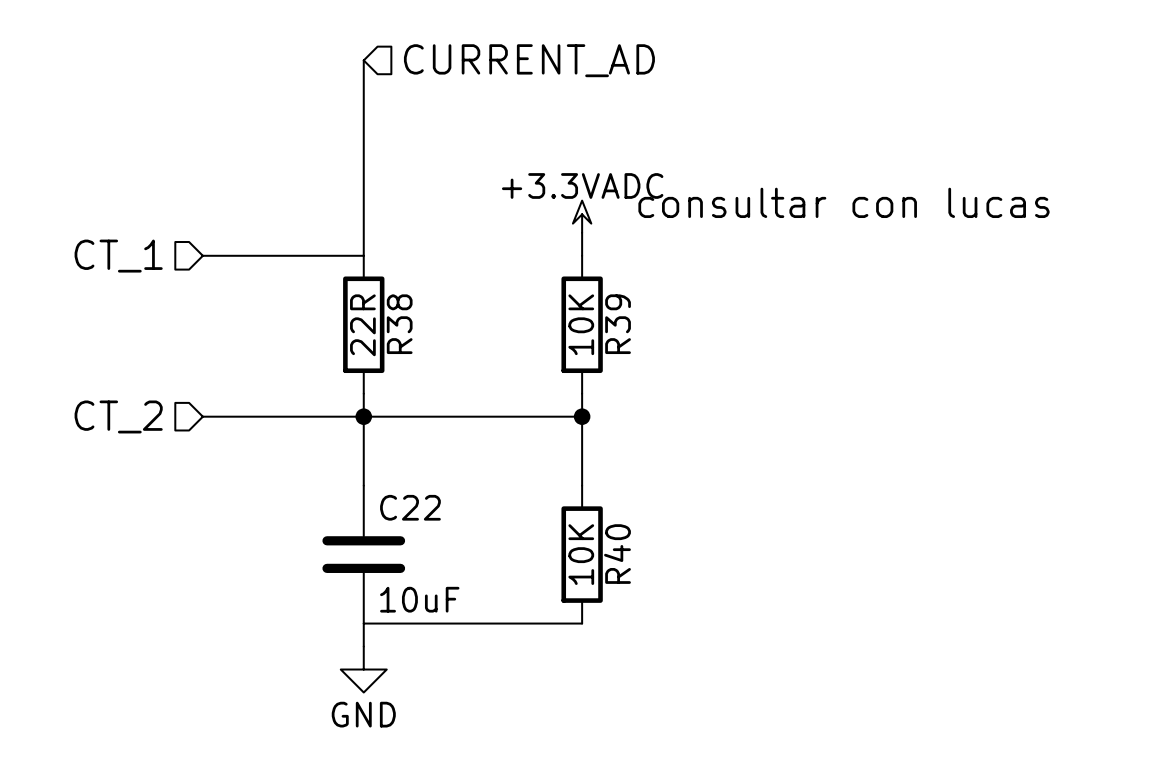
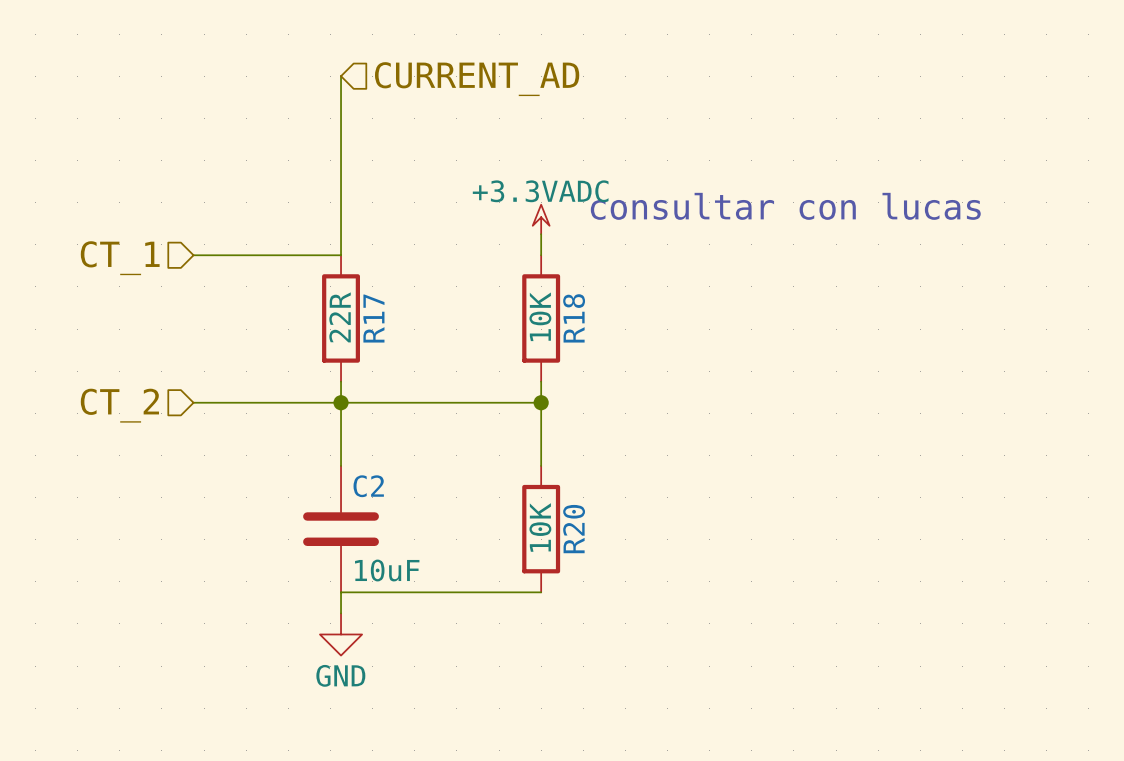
R38 name: R38 (399, 324) -> R17 (373, 318)
R39 name: R39 (618, 324) -> R18 (574, 318)
C22 name: C22 (410, 507) -> C2 (368, 486)
R40 name: R40 (617, 554) -> R20 (574, 529)

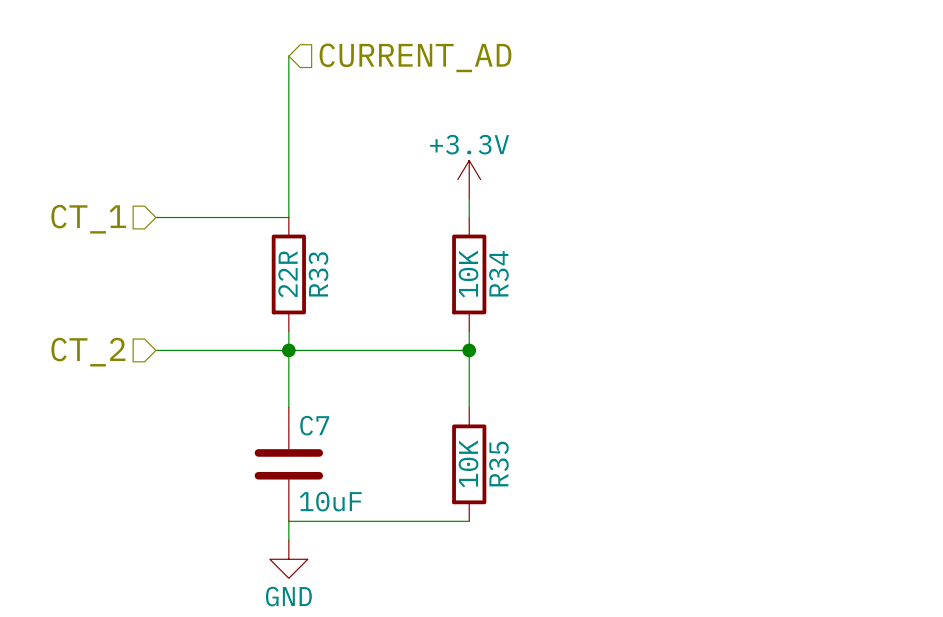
text: consultar con lucas (785, 206) -> none
power symbol: +3.3VADC (541, 219) -> +3.3V (469, 179)
R17 name: R17 (373, 318) -> R33 (318, 274)
R18 name: R18 (574, 318) -> R34 (498, 273)
C2 name: C2 (368, 486) -> C7 (314, 425)
R20 name: R20 (574, 529) -> R35 (498, 464)

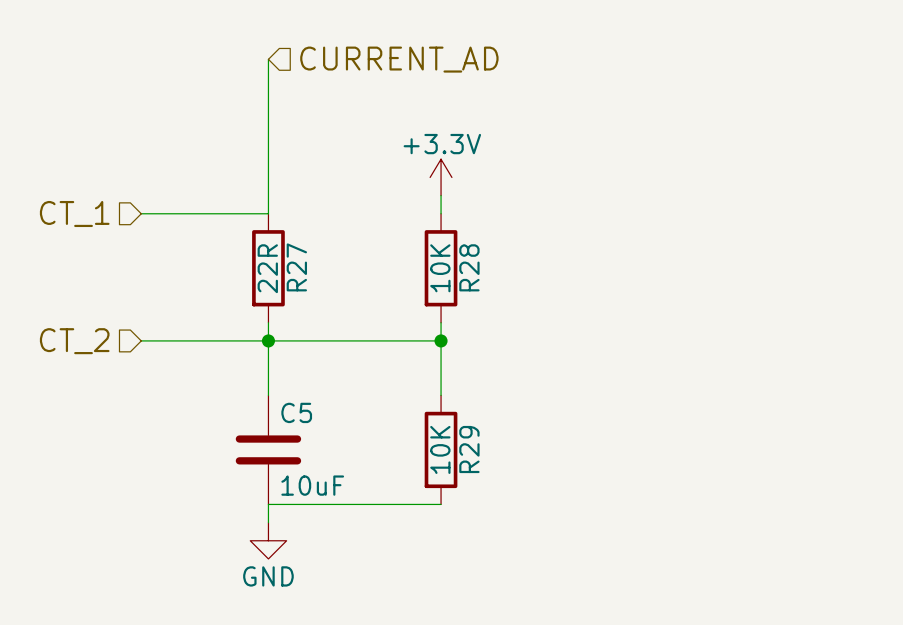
R34 name: R34 (498, 273) -> R28 (469, 267)
R33 name: R33 (318, 274) -> R27 (296, 267)
C7 name: C7 (314, 425) -> C5 (296, 412)
R35 name: R35 (498, 464) -> R29 (469, 449)

